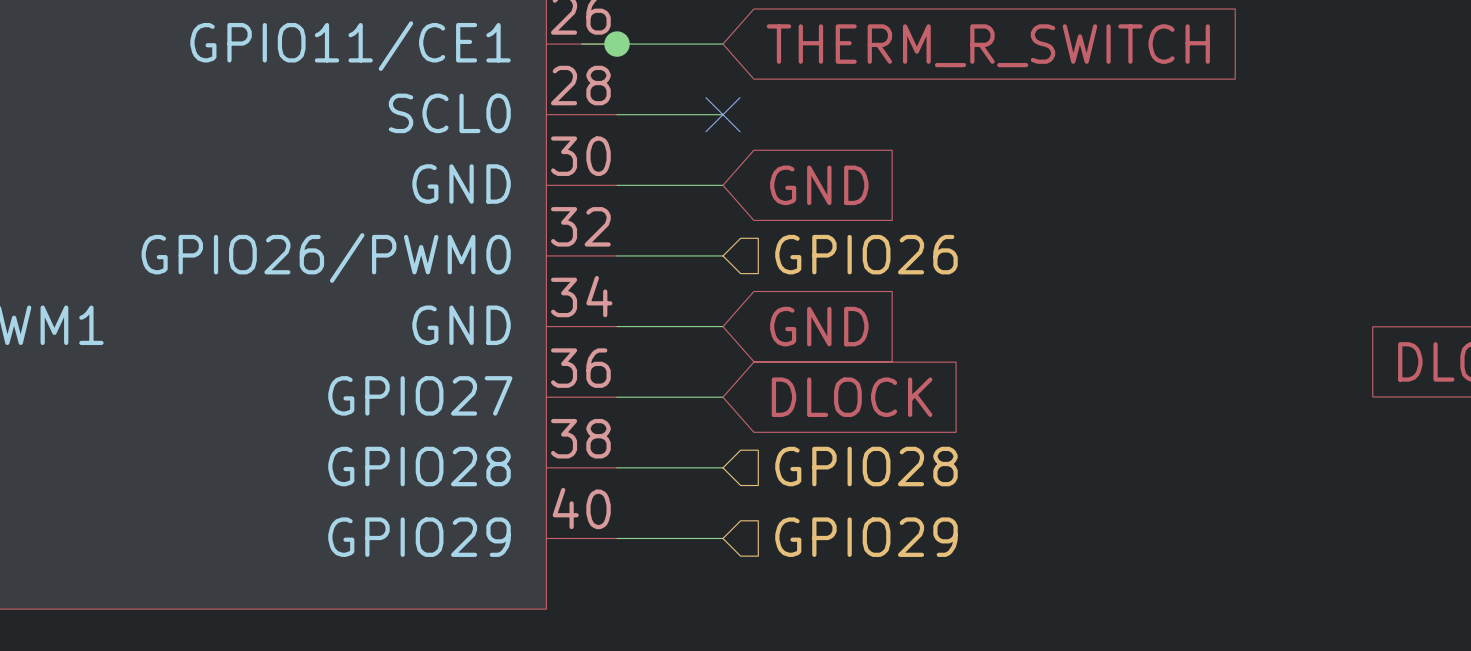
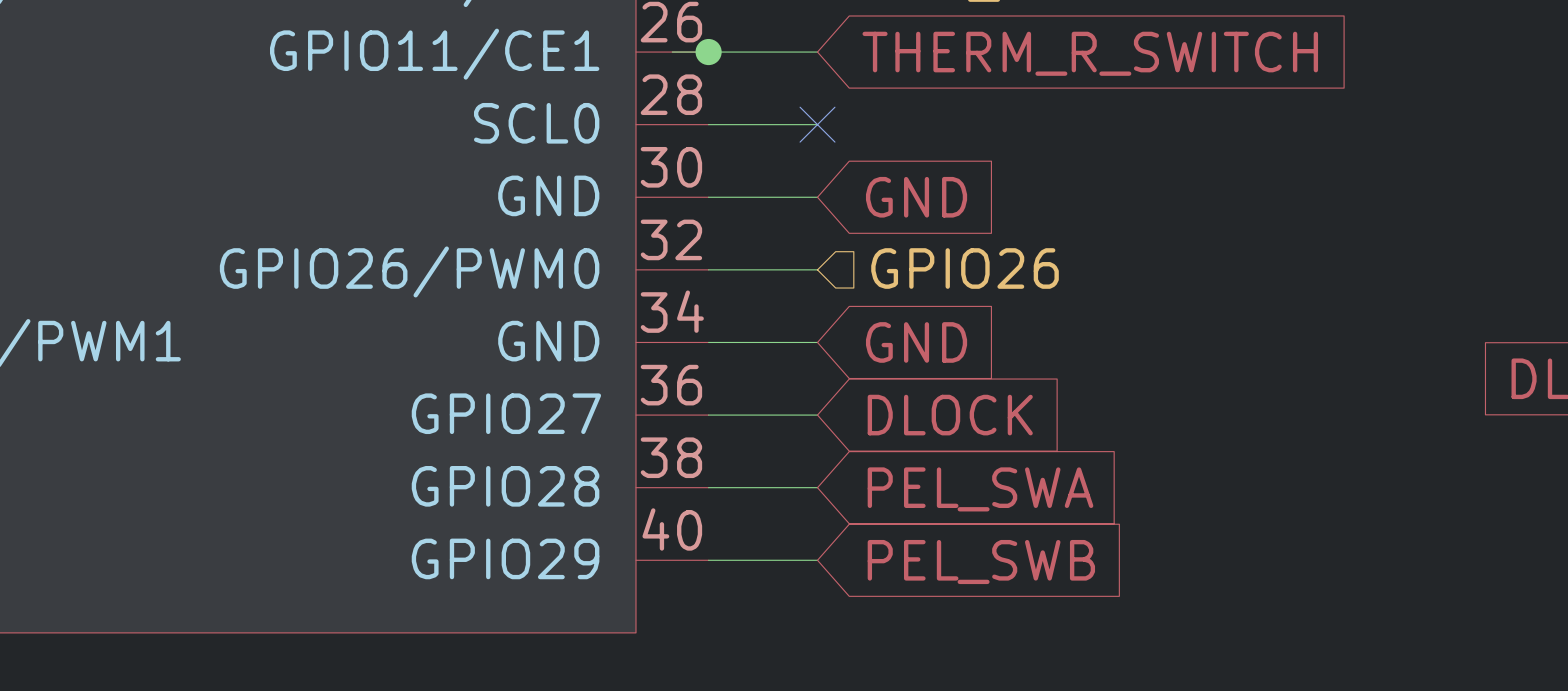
hierarchical label: GPIO28 (866, 466) -> none
global label: none -> PEL_SWA (980, 489)
hierarchical label: GPIO29 (866, 537) -> none
global label: none -> PEL_SWB (981, 562)

